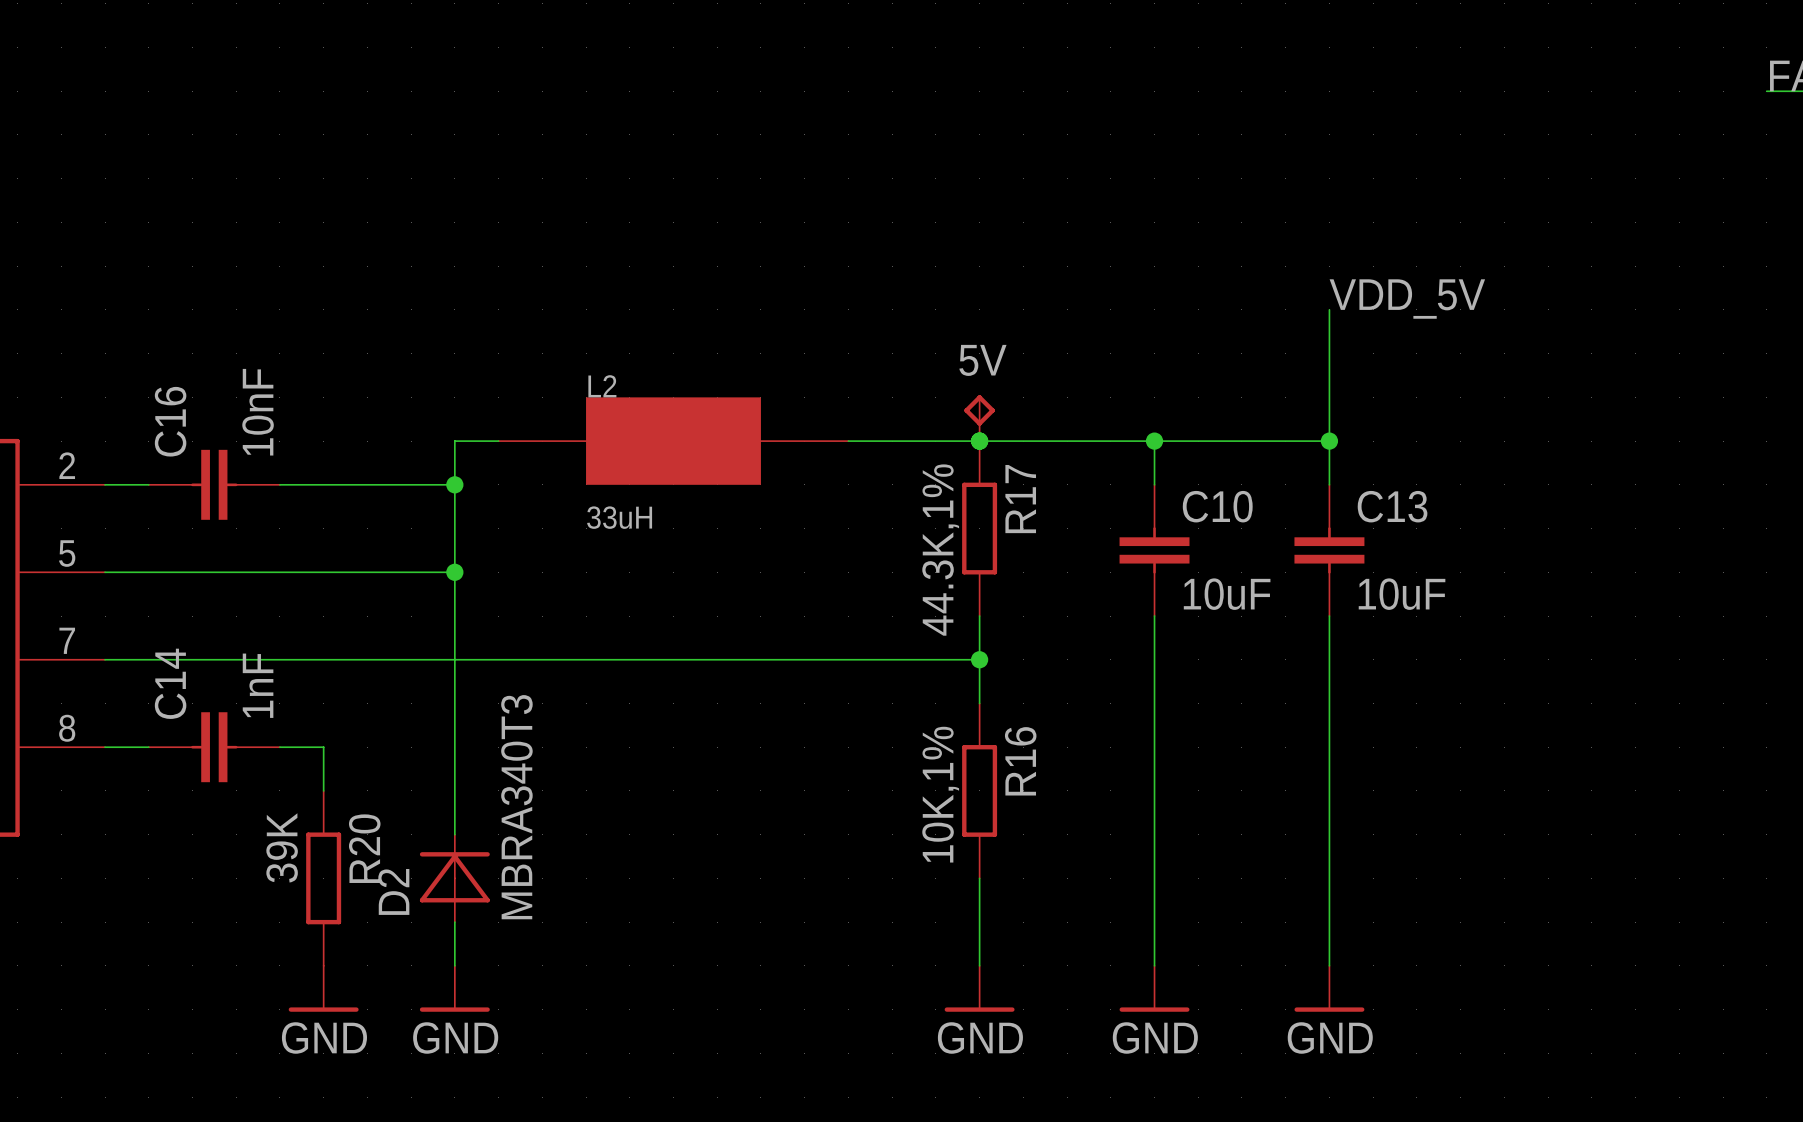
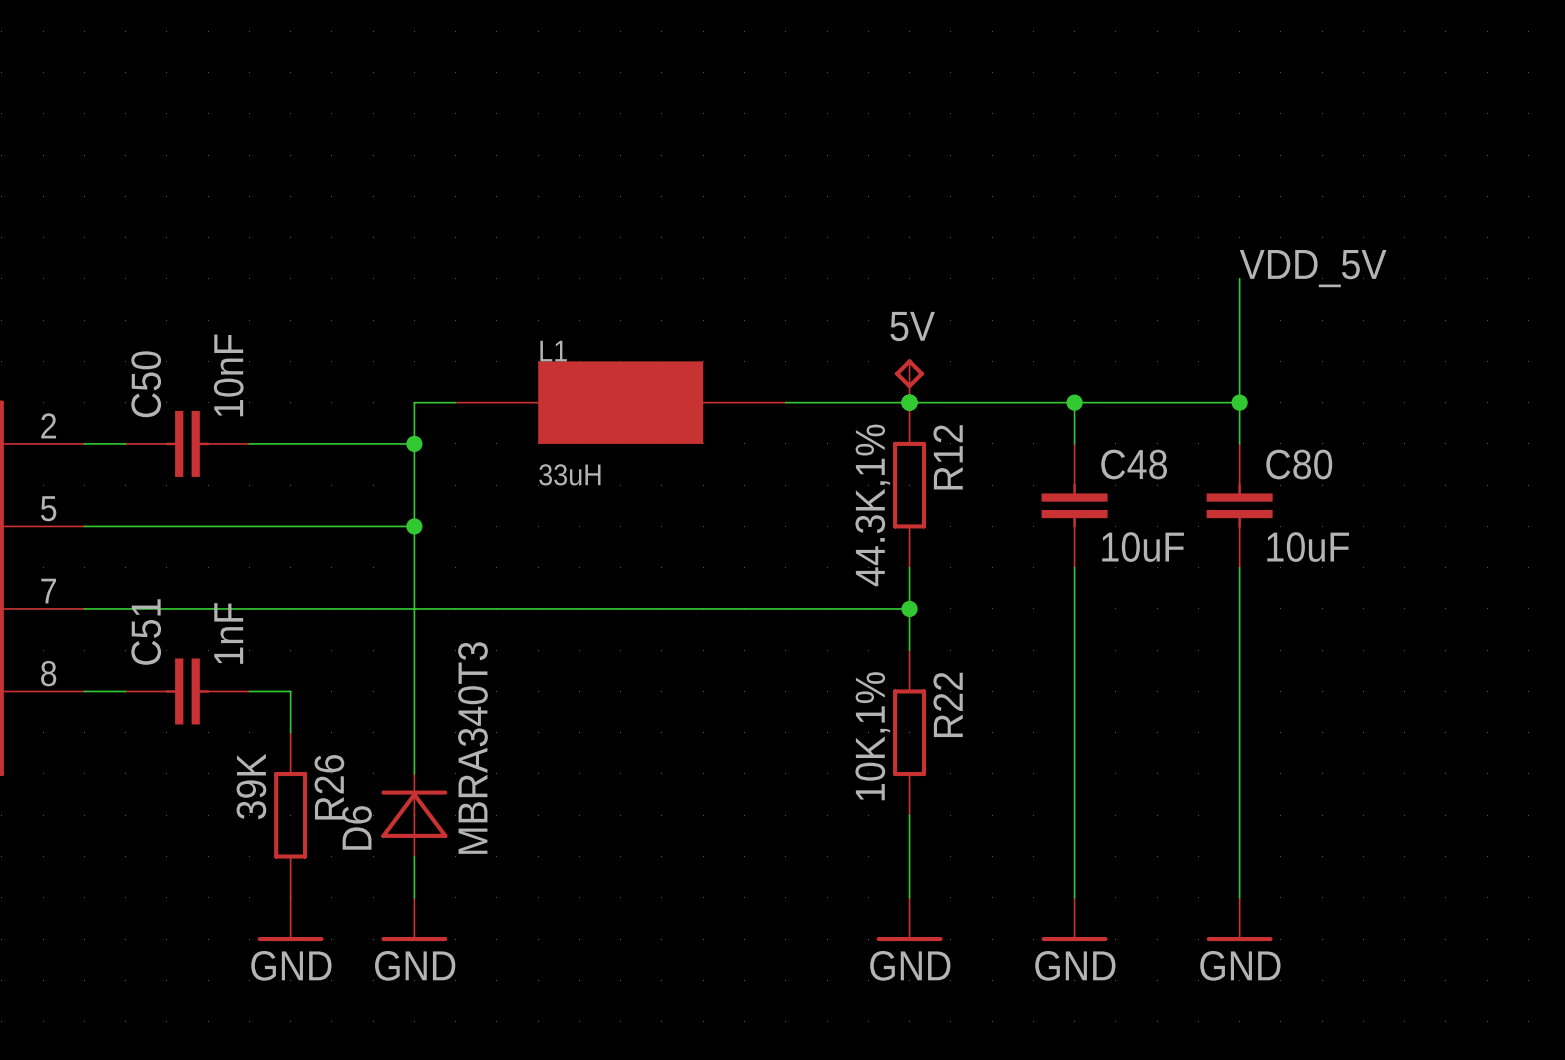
L2 name: L2 (602, 386) -> L1 (553, 351)
C16 name: C16 (170, 421) -> C50 (146, 384)
R17 name: R17 (1020, 499) -> R12 (948, 457)
C10 name: C10 (1217, 506) -> C48 (1134, 464)
C13 name: C13 (1392, 506) -> C80 (1299, 464)
C14 name: C14 (170, 683) -> C51 (146, 632)
R16 name: R16 (1020, 761) -> R22 (948, 704)
R20 name: R20 (364, 848) -> R26 (329, 787)
D2 name: D2 (393, 891) -> D6 (357, 827)

